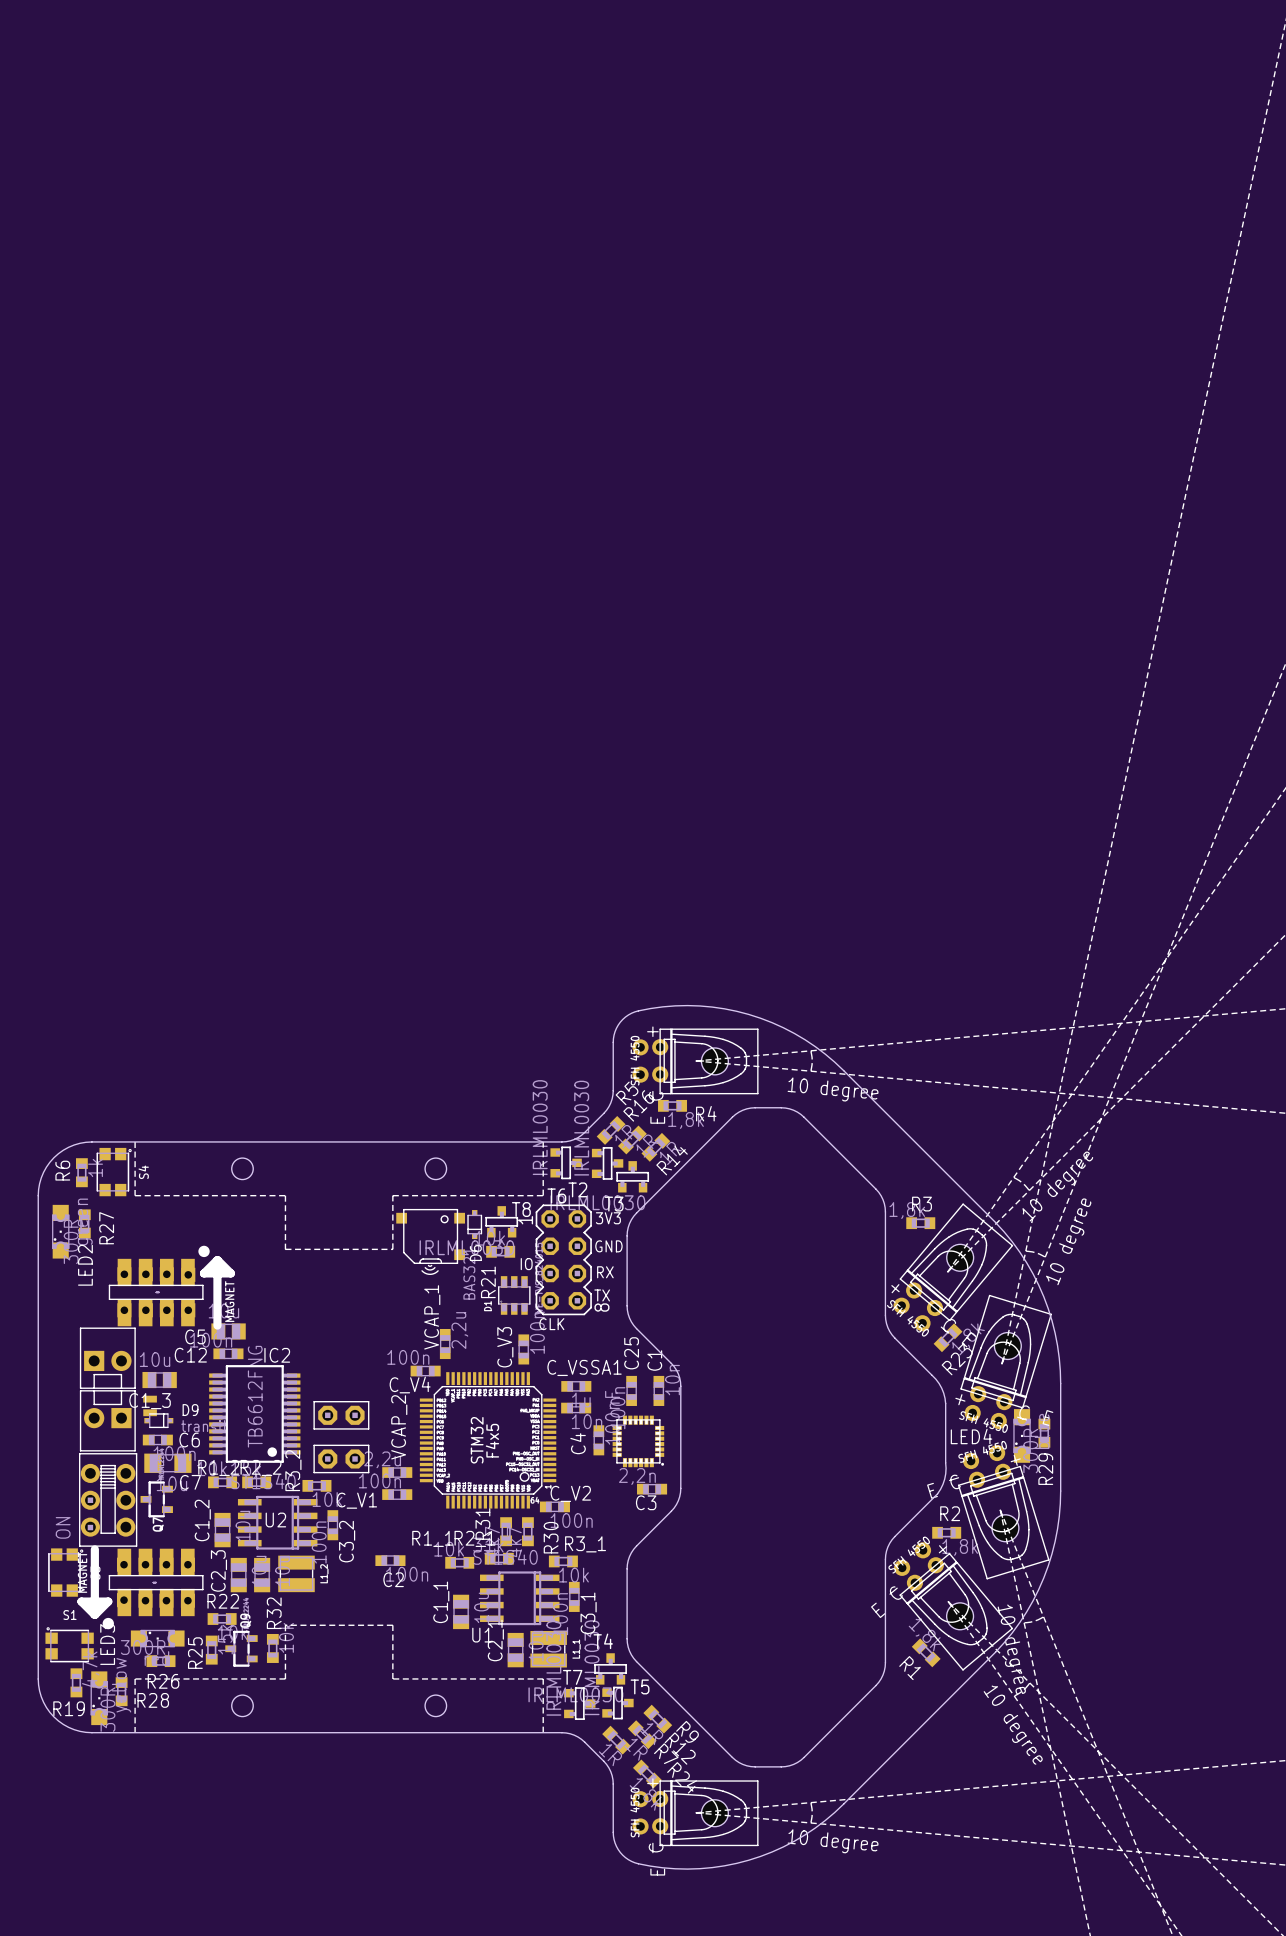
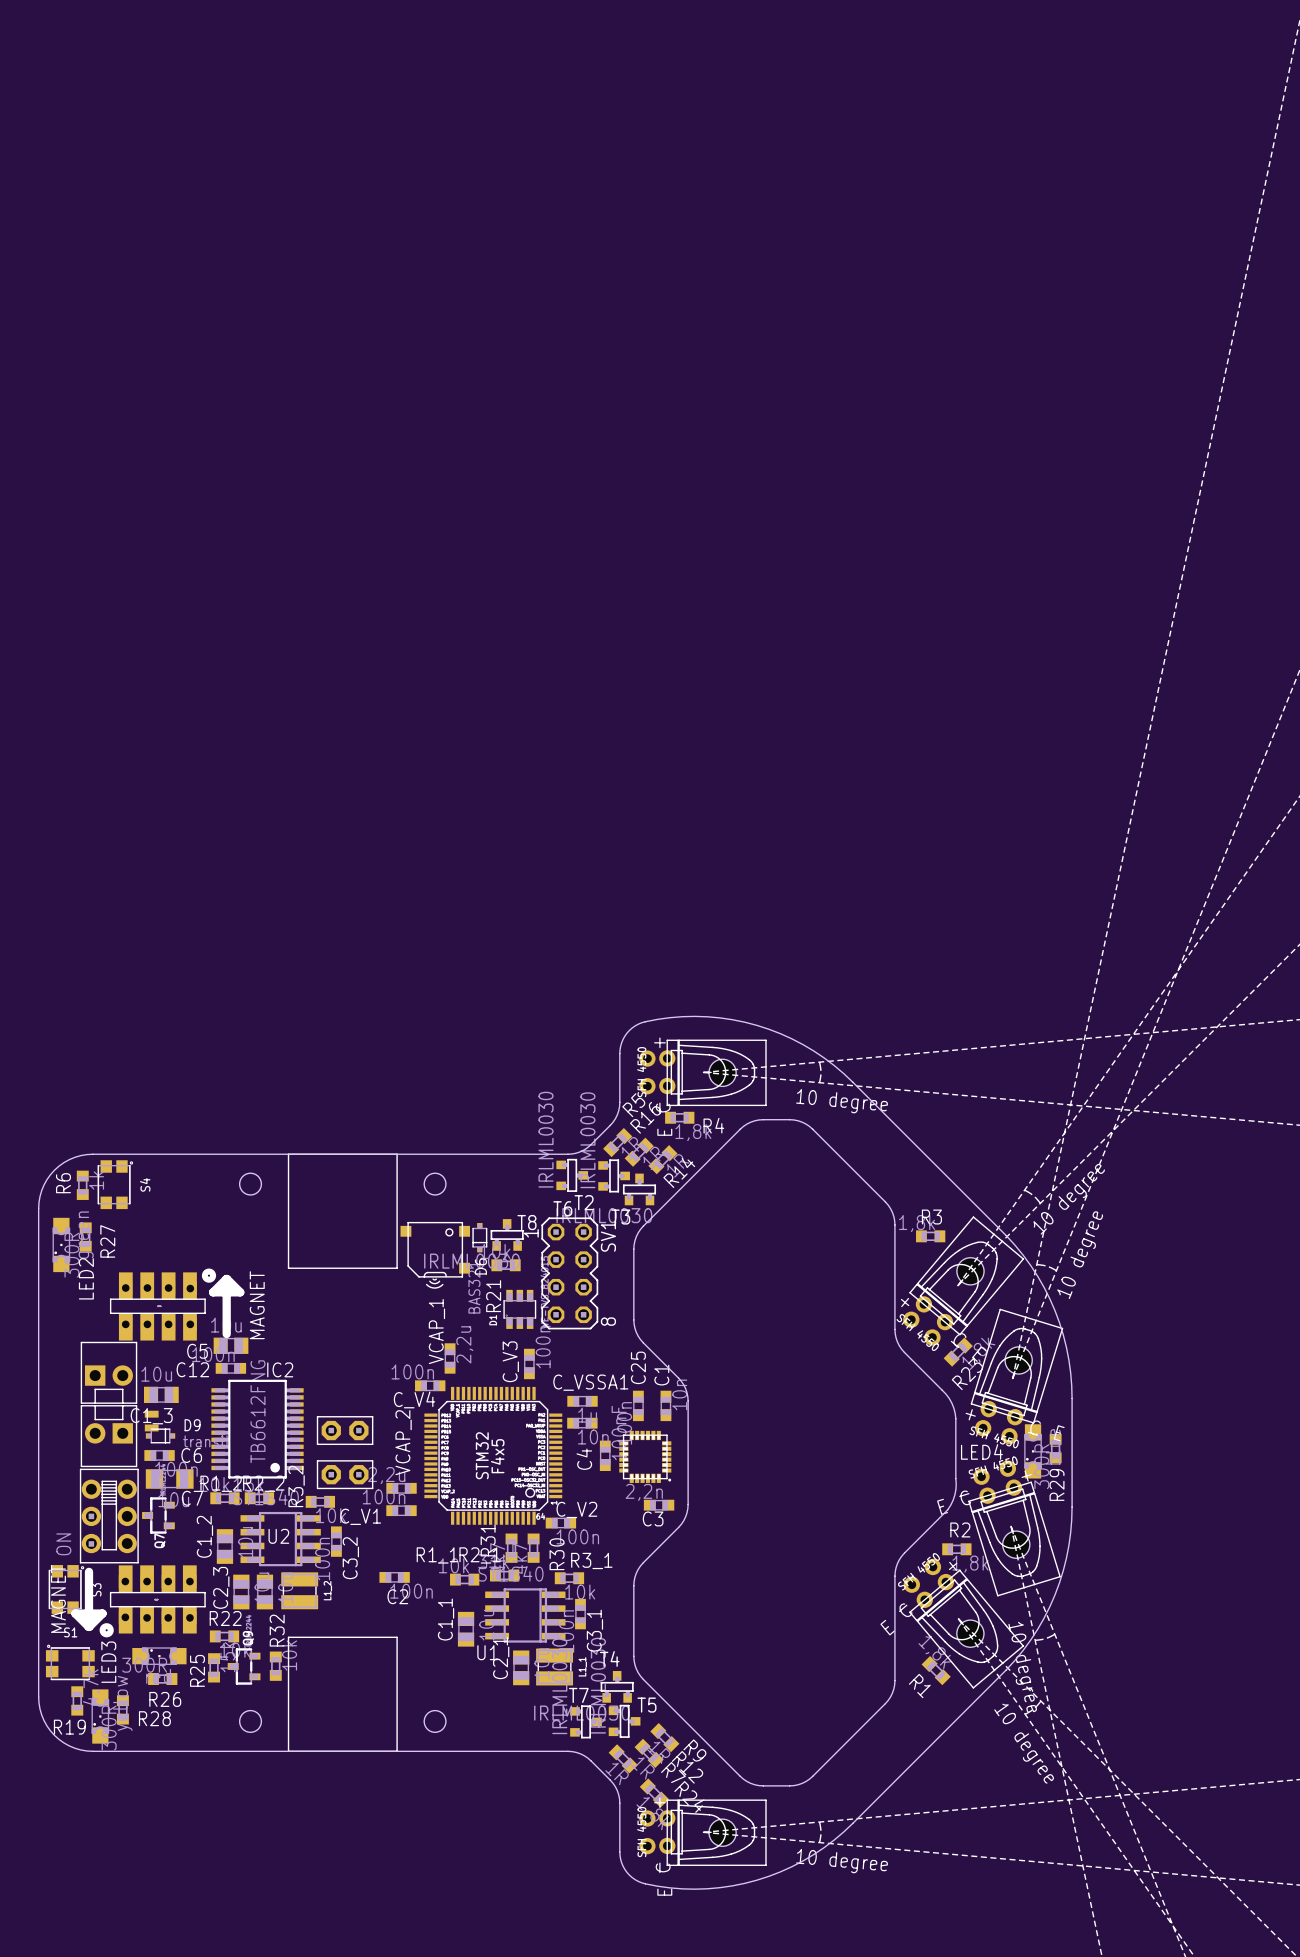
drawing shape: [134, 1141, 544, 1734] -> [239, 1153, 447, 1753]
text: 3V3 (608, 1218) -> none
part footprint: [108, 1245, 235, 1330] -> [109, 1268, 245, 1341]
text: GND (608, 1246) -> none
part: (563, 1259) -> none
SV1: none -> (569, 1273)
text: IO (526, 1264) -> none
text: RX (605, 1272) -> none
text: TX (602, 1295) -> none
text: CLK (551, 1324) -> none
part footprint: [77, 1545, 204, 1630] -> [71, 1565, 206, 1638]

